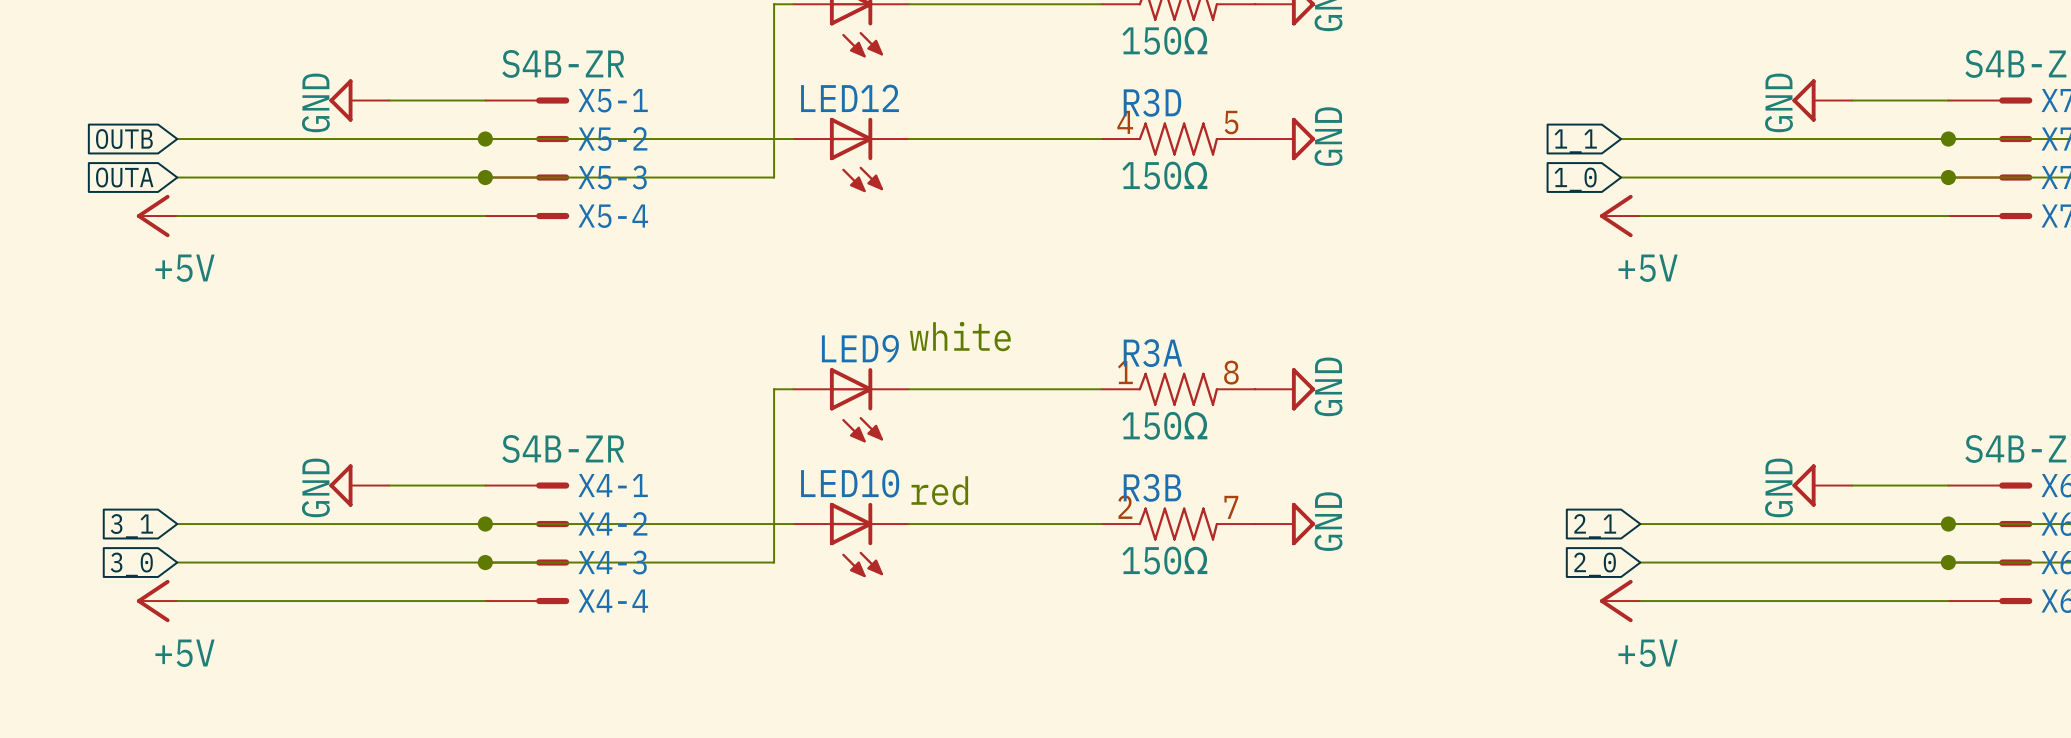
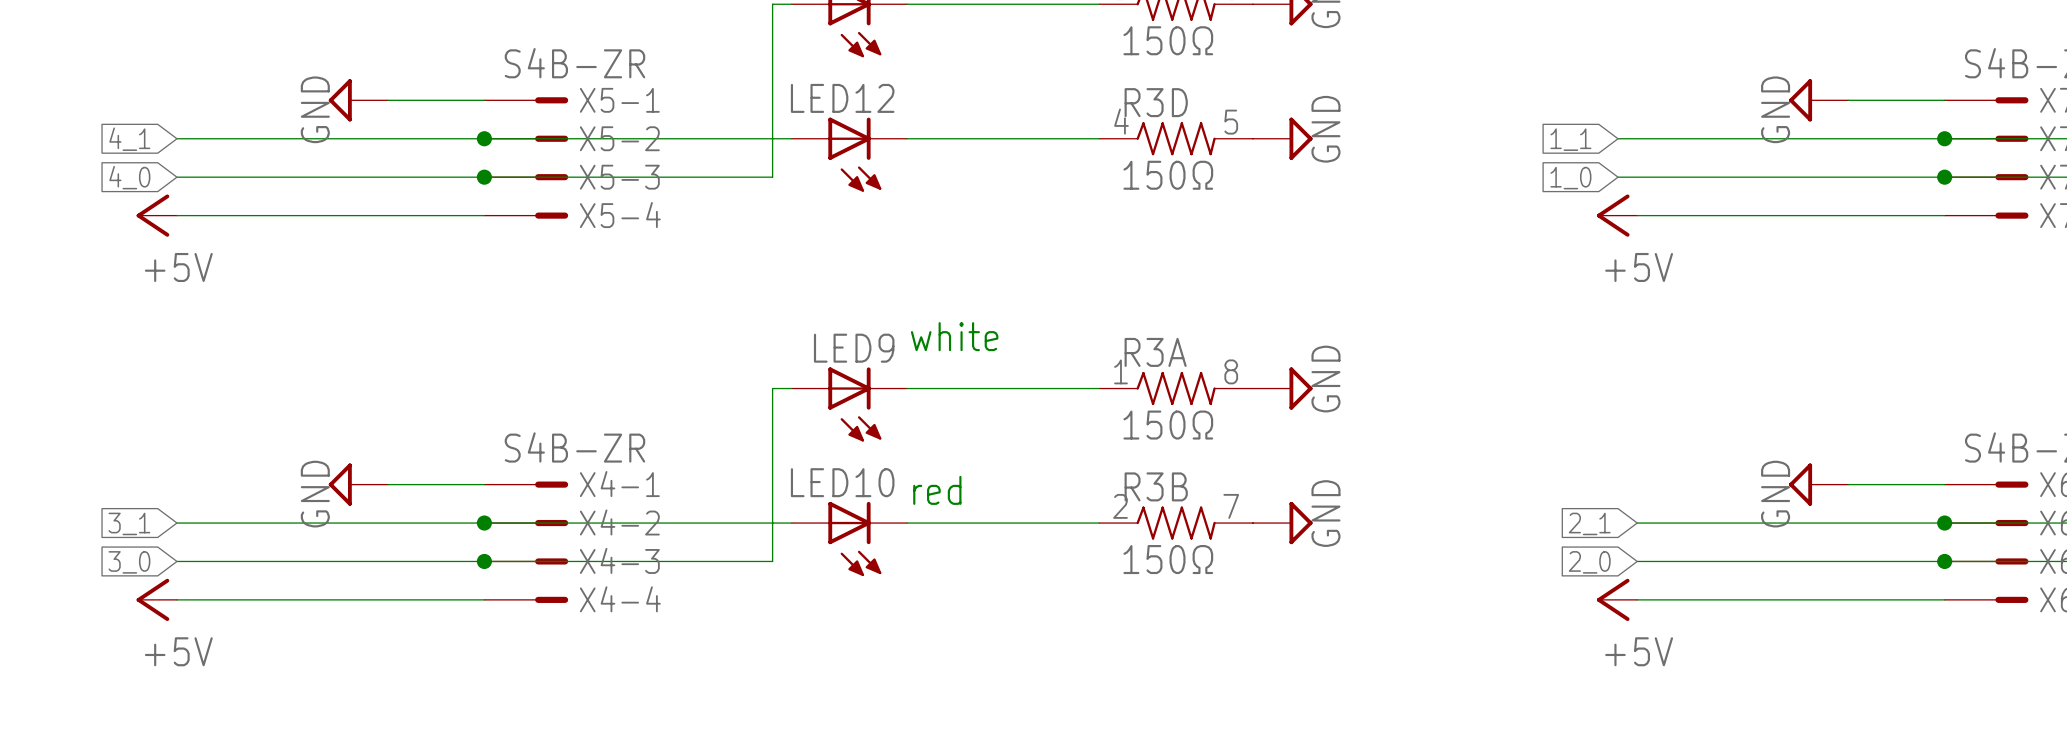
global label: OUTB (124, 139) -> 4_1 (129, 139)
global label: OUTA (124, 177) -> 4_0 (129, 177)

